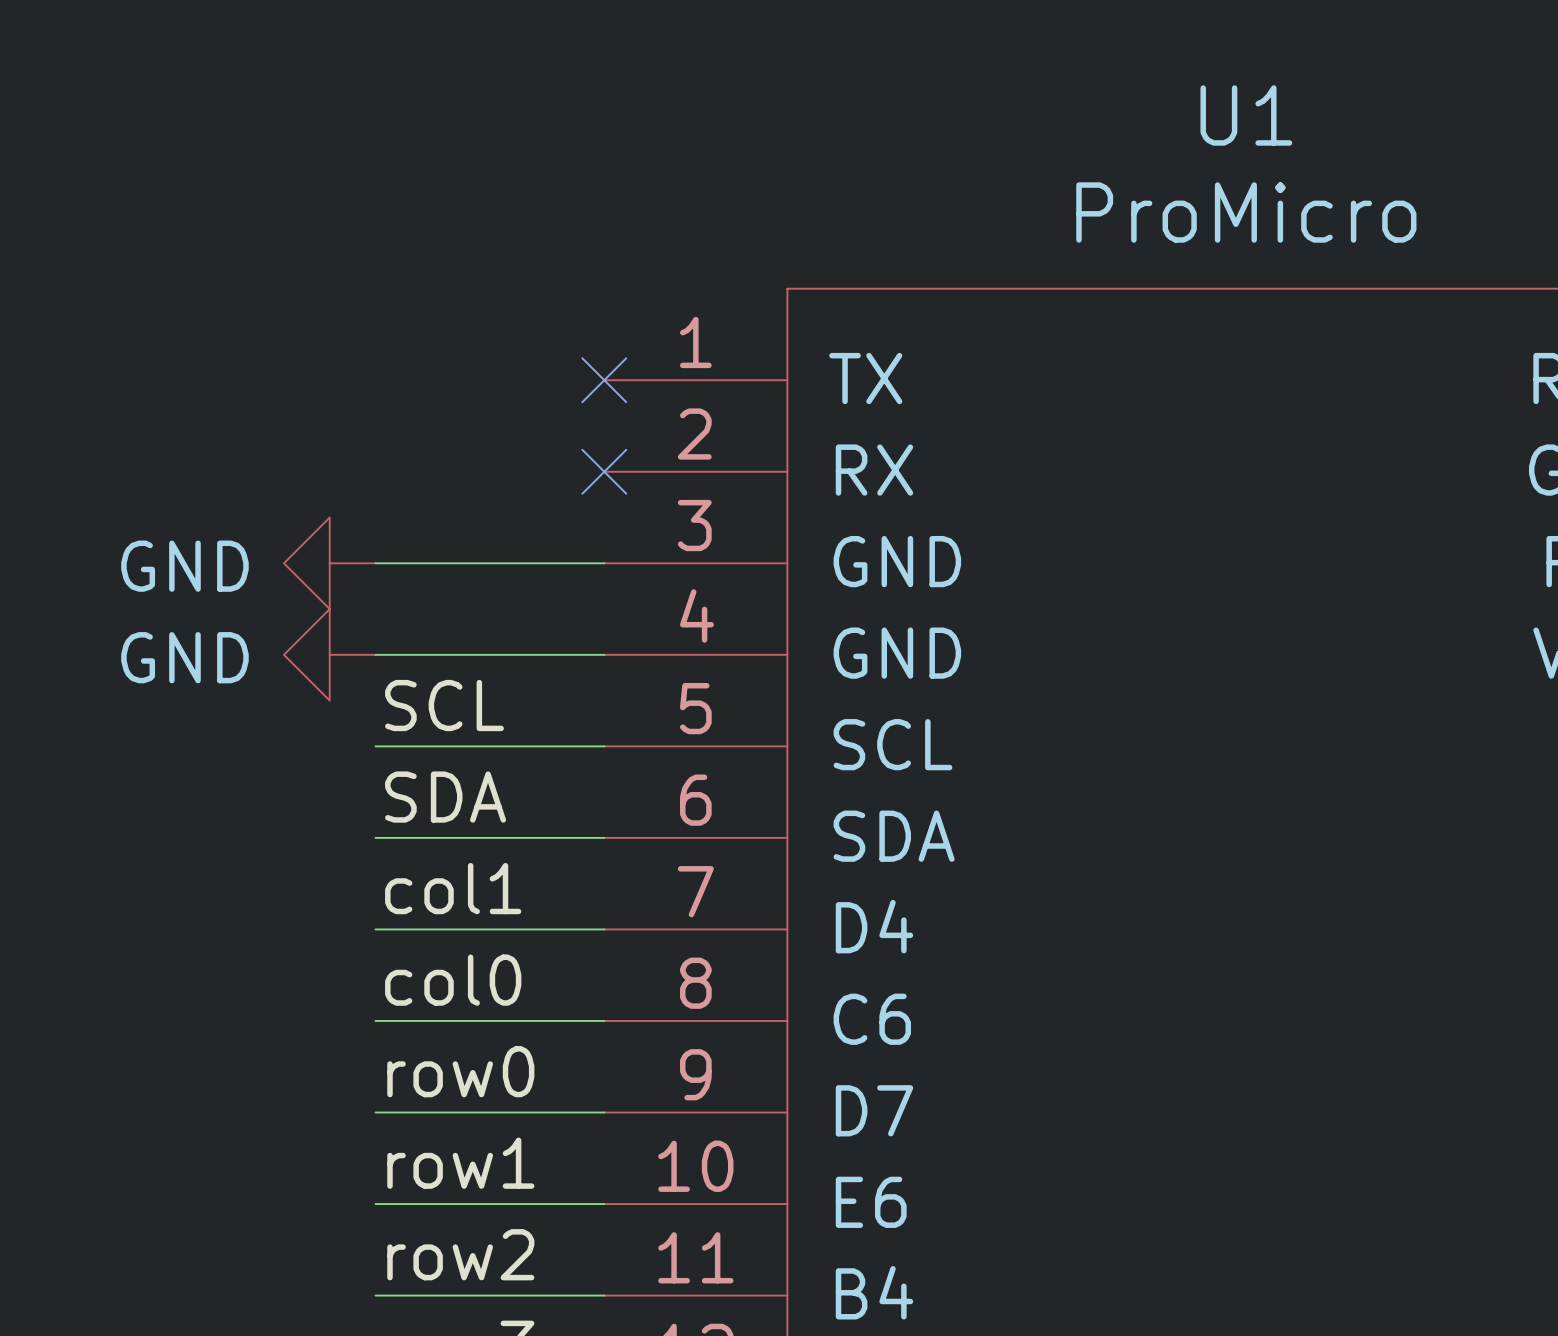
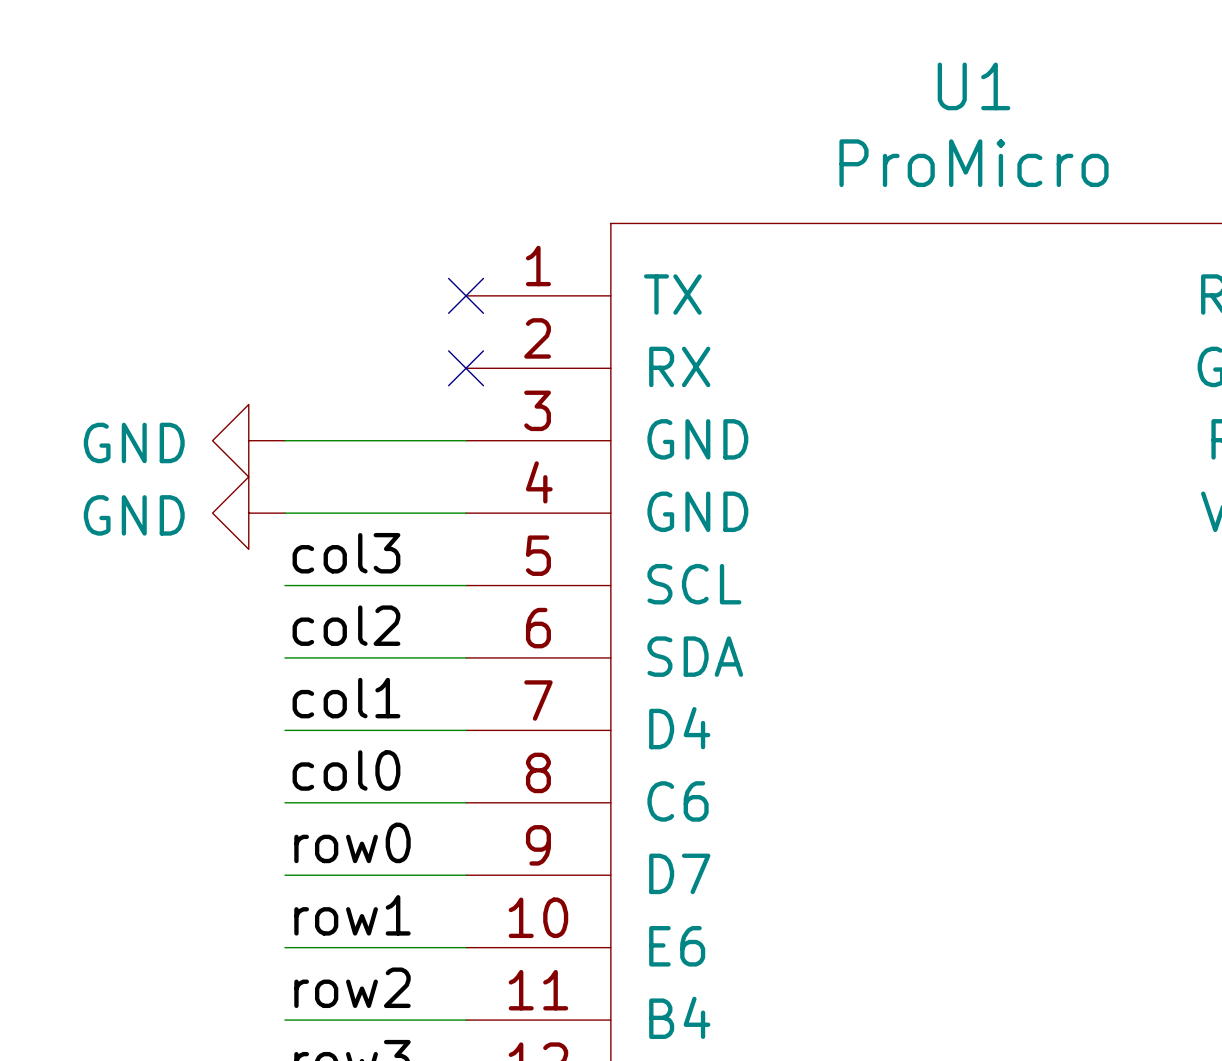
label: SCL (444, 705) -> col3 (346, 553)
label: SDA (445, 797) -> col2 (346, 625)

